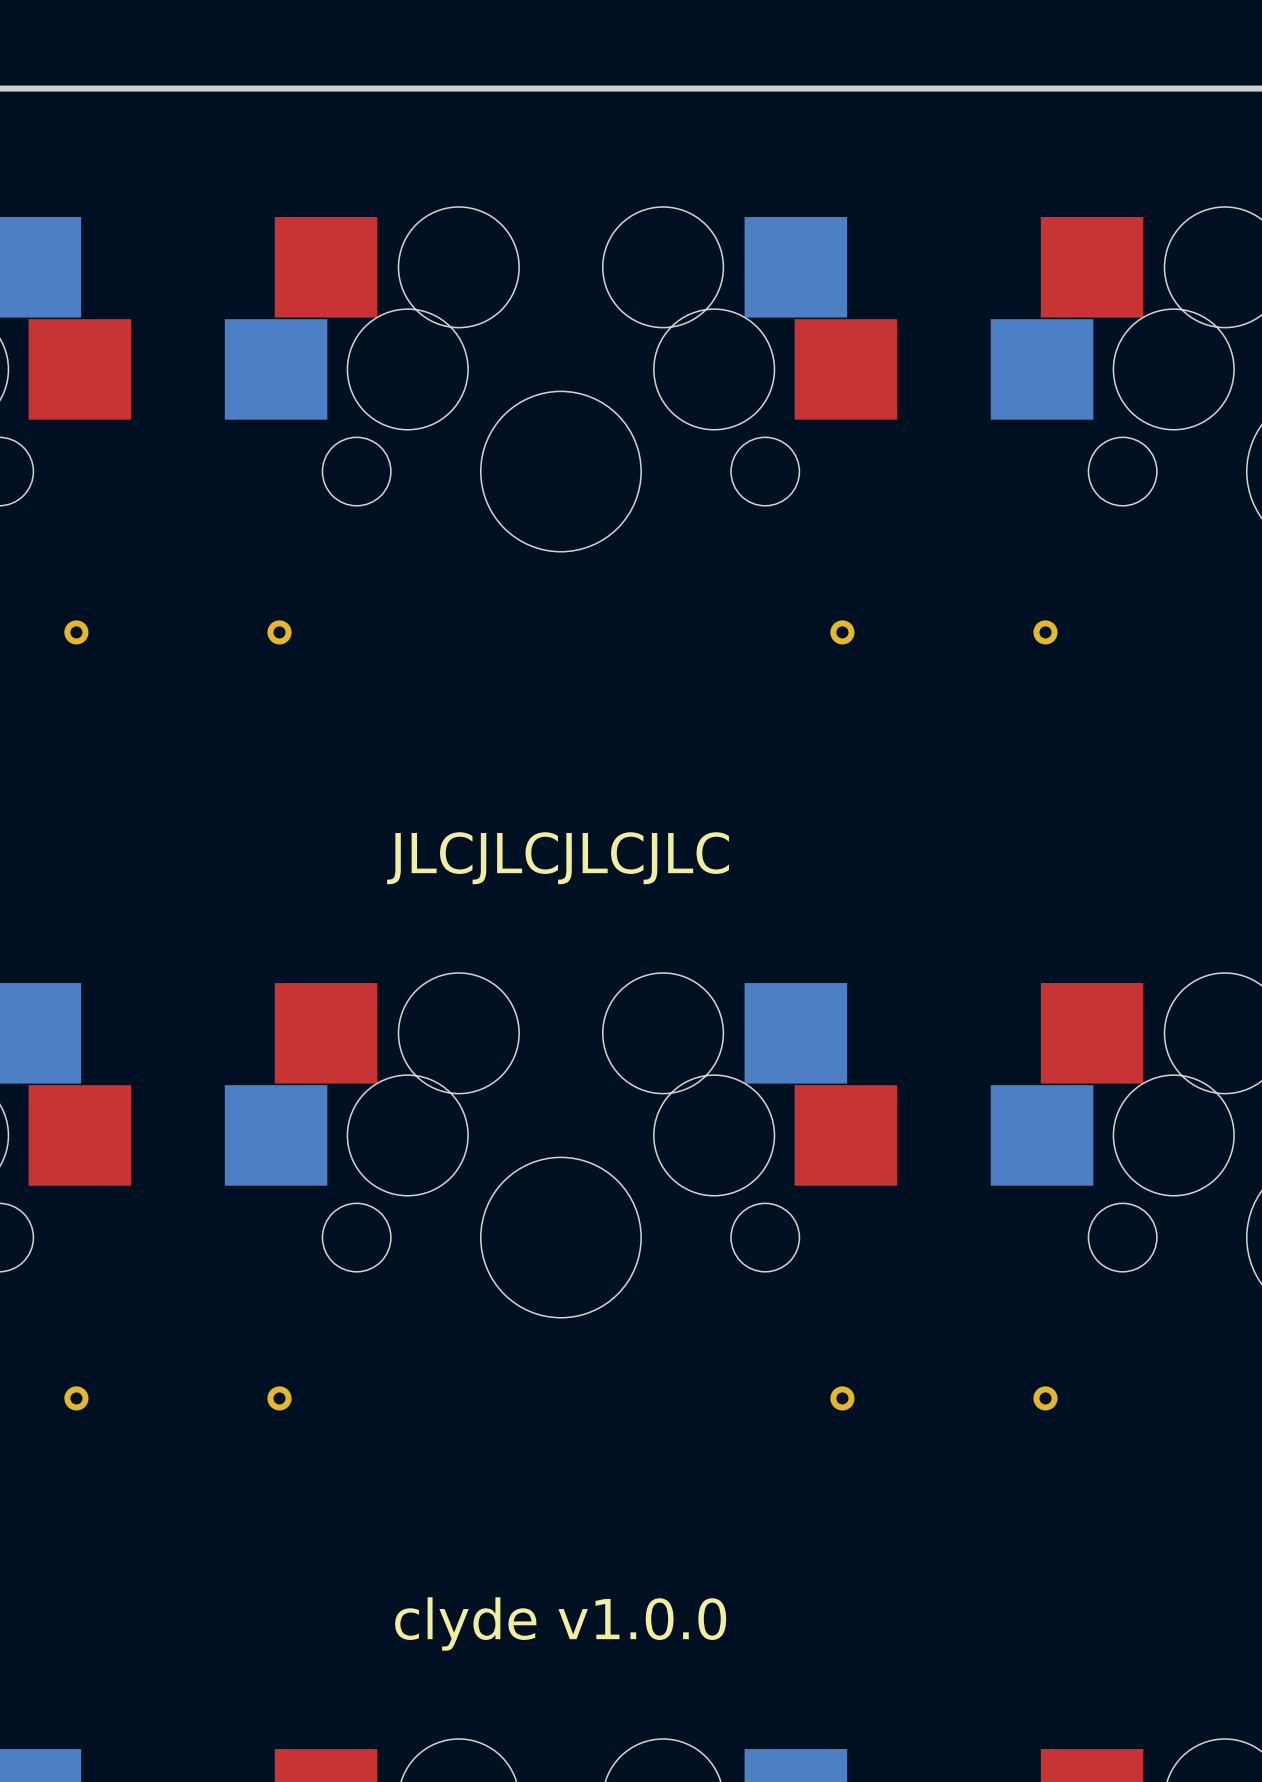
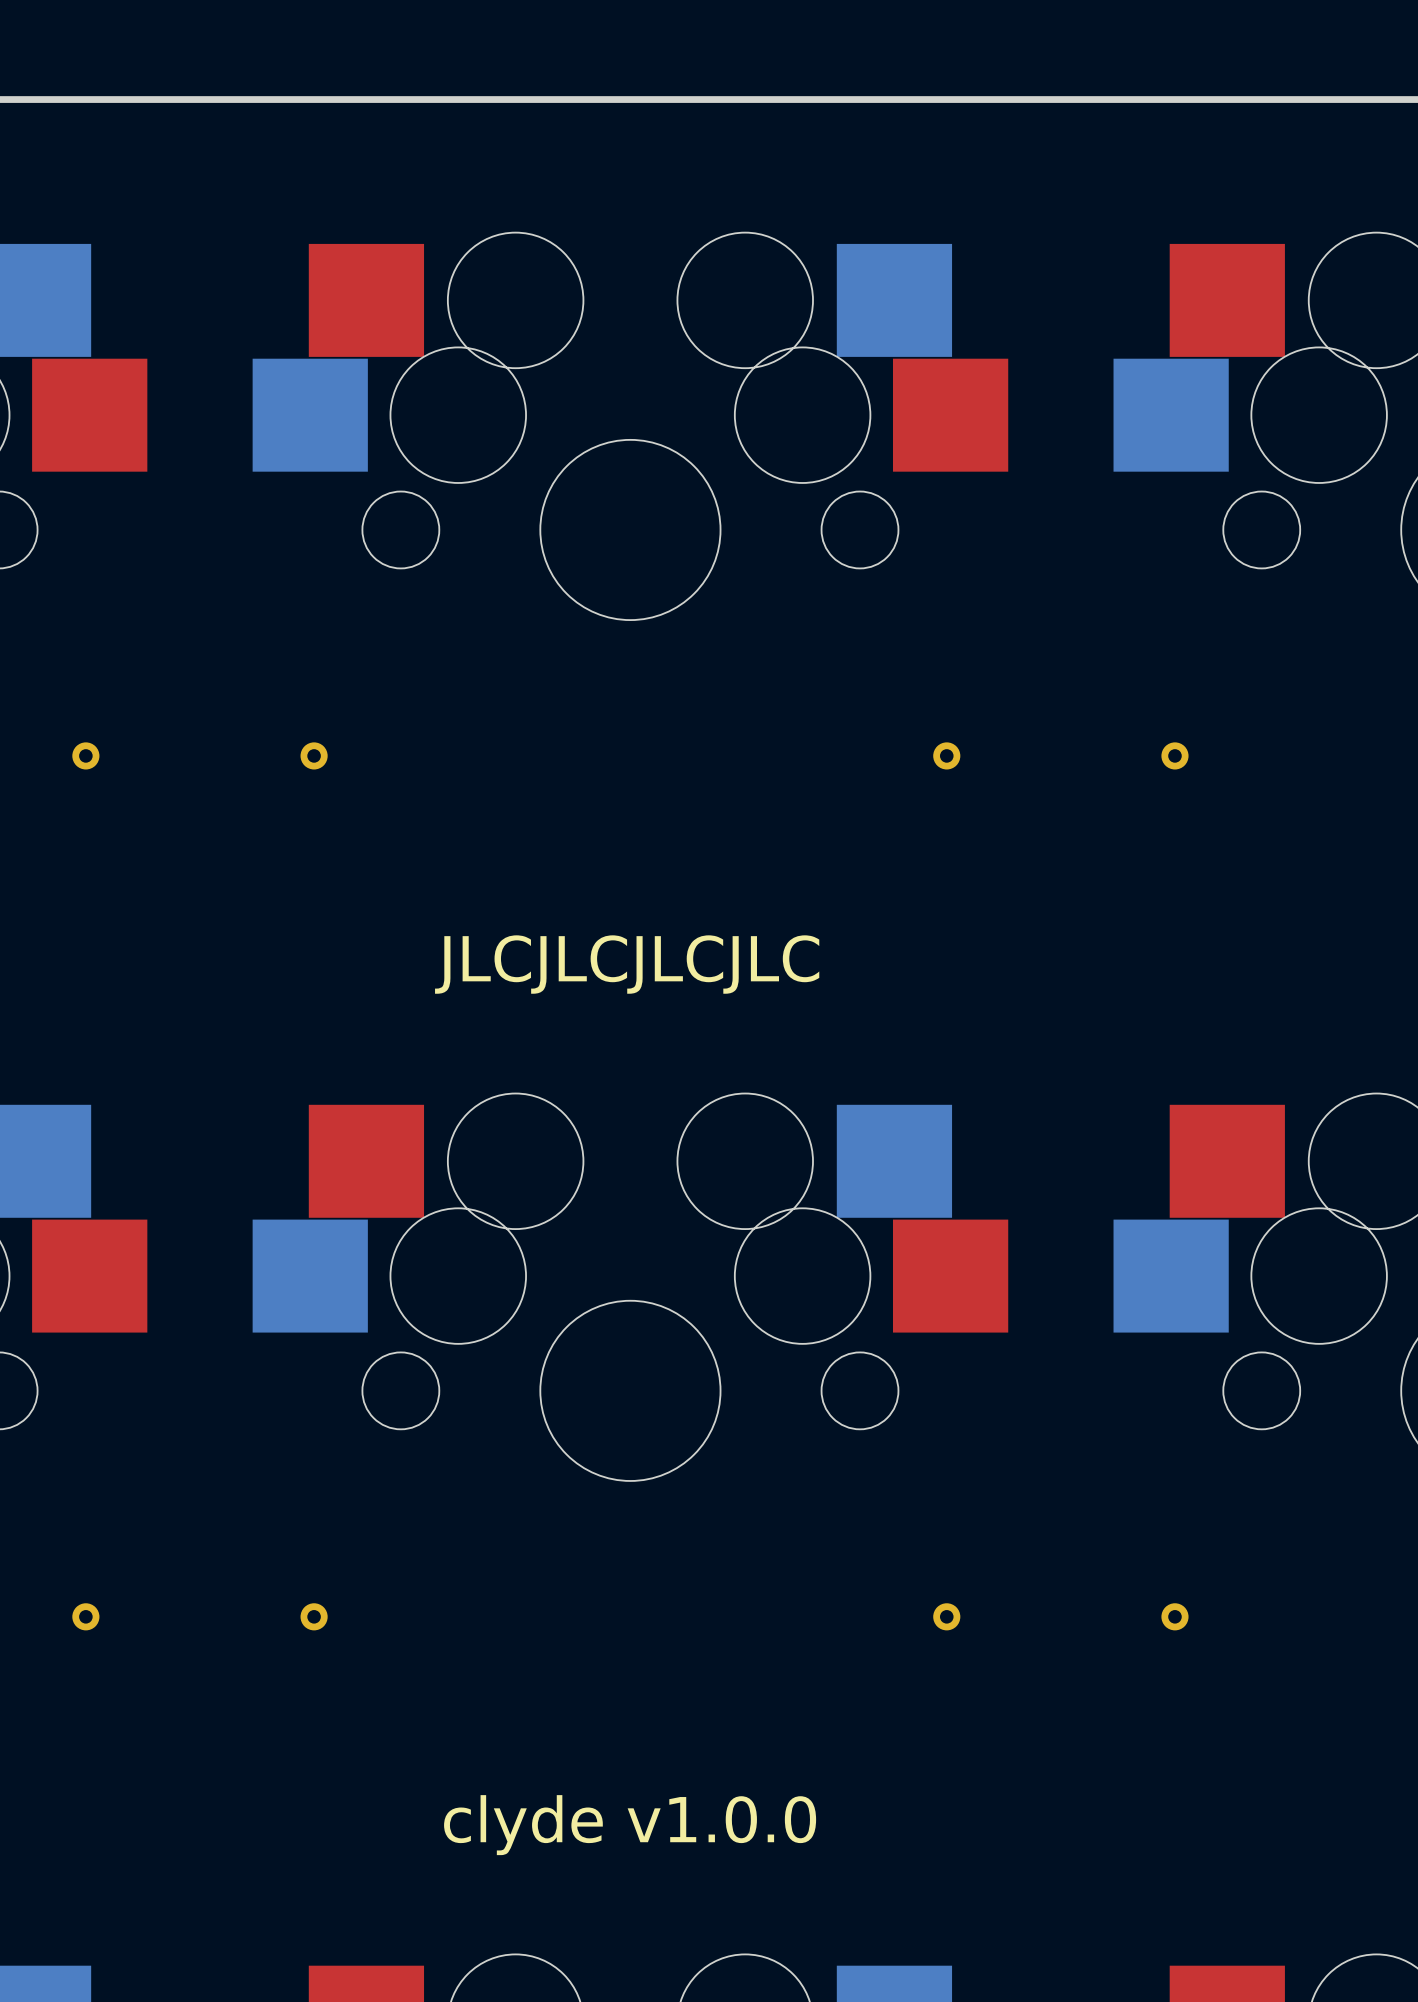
part position: (76, 632) -> (85, 755)
part position: (279, 632) -> (314, 755)
part position: (842, 632) -> (946, 755)
part position: (1045, 632) -> (1174, 755)
part position: (76, 1398) -> (85, 1616)
part position: (279, 1398) -> (314, 1616)
part position: (842, 1398) -> (946, 1616)
part position: (1045, 1398) -> (1174, 1616)

